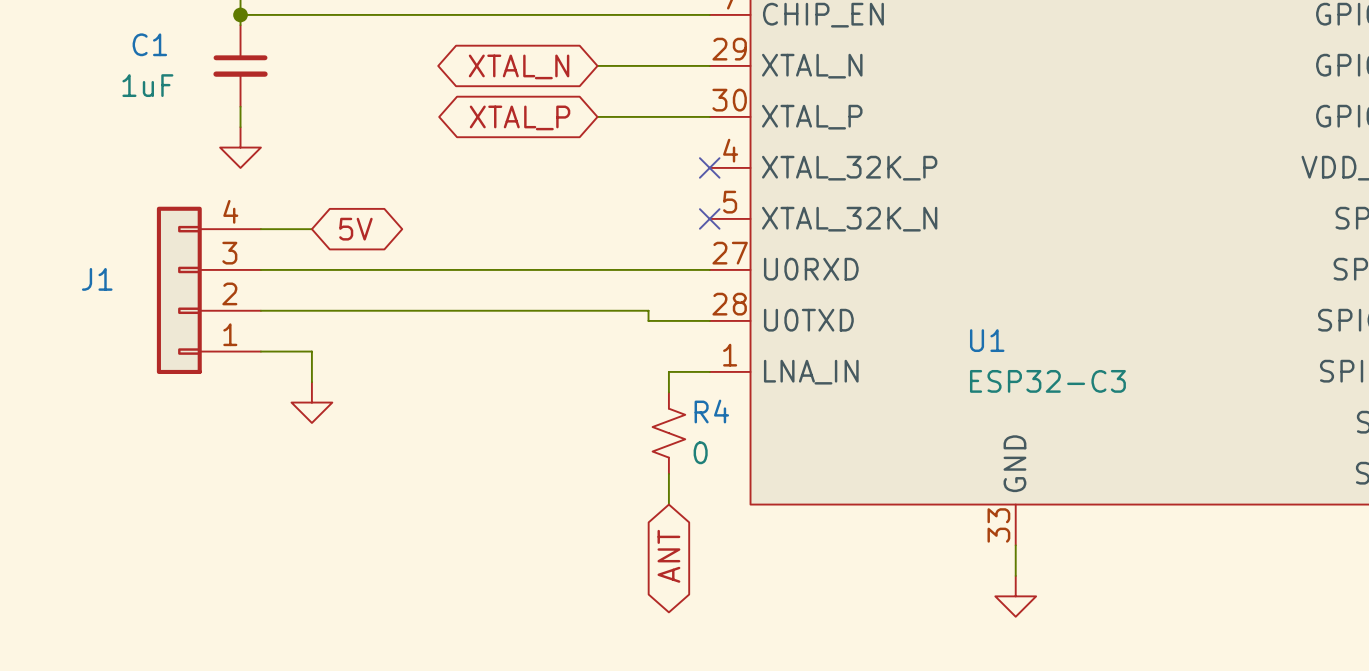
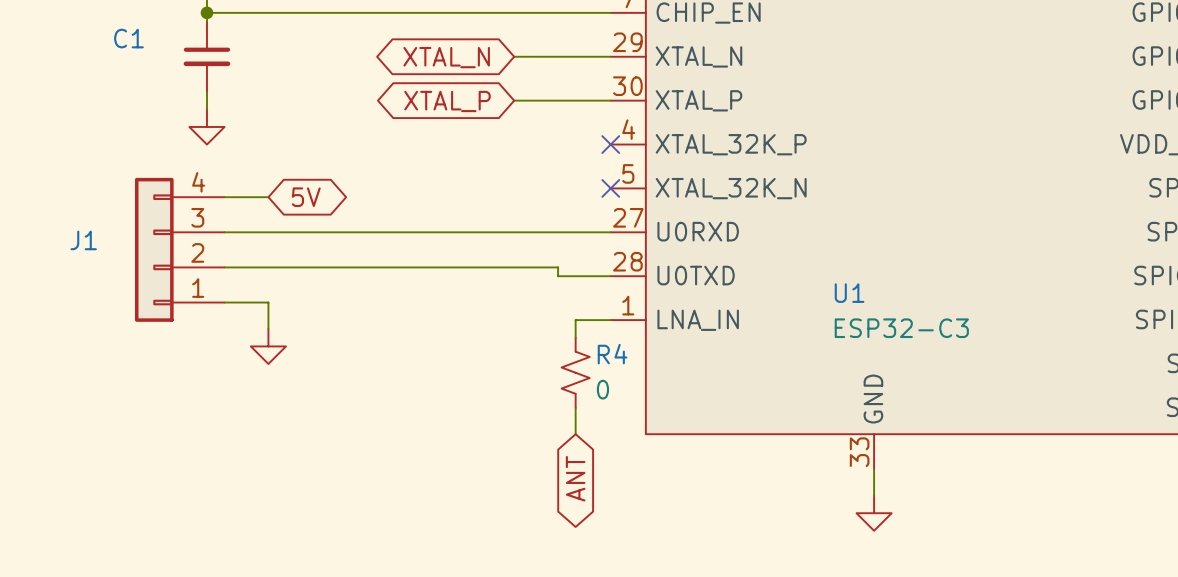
C1 value: 1uF (147, 85) -> none

